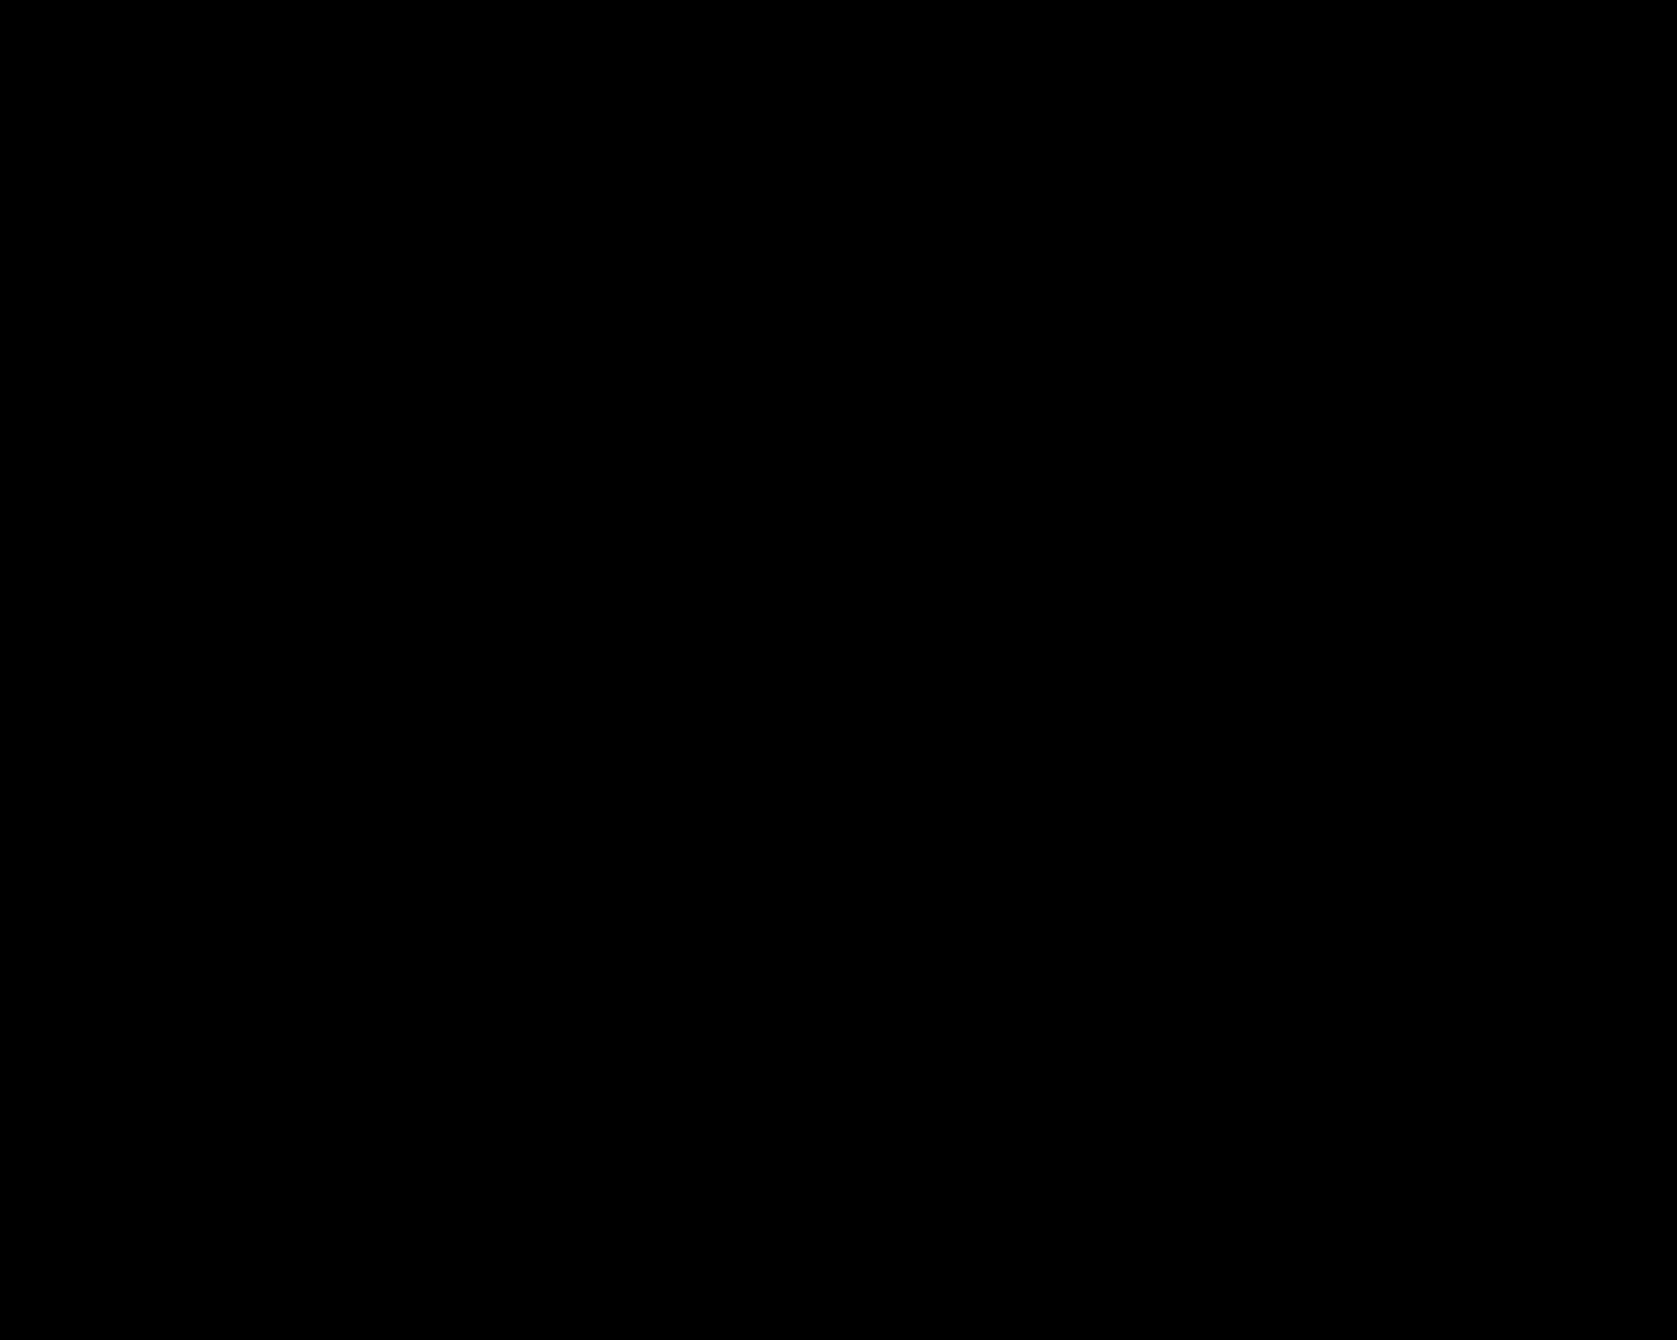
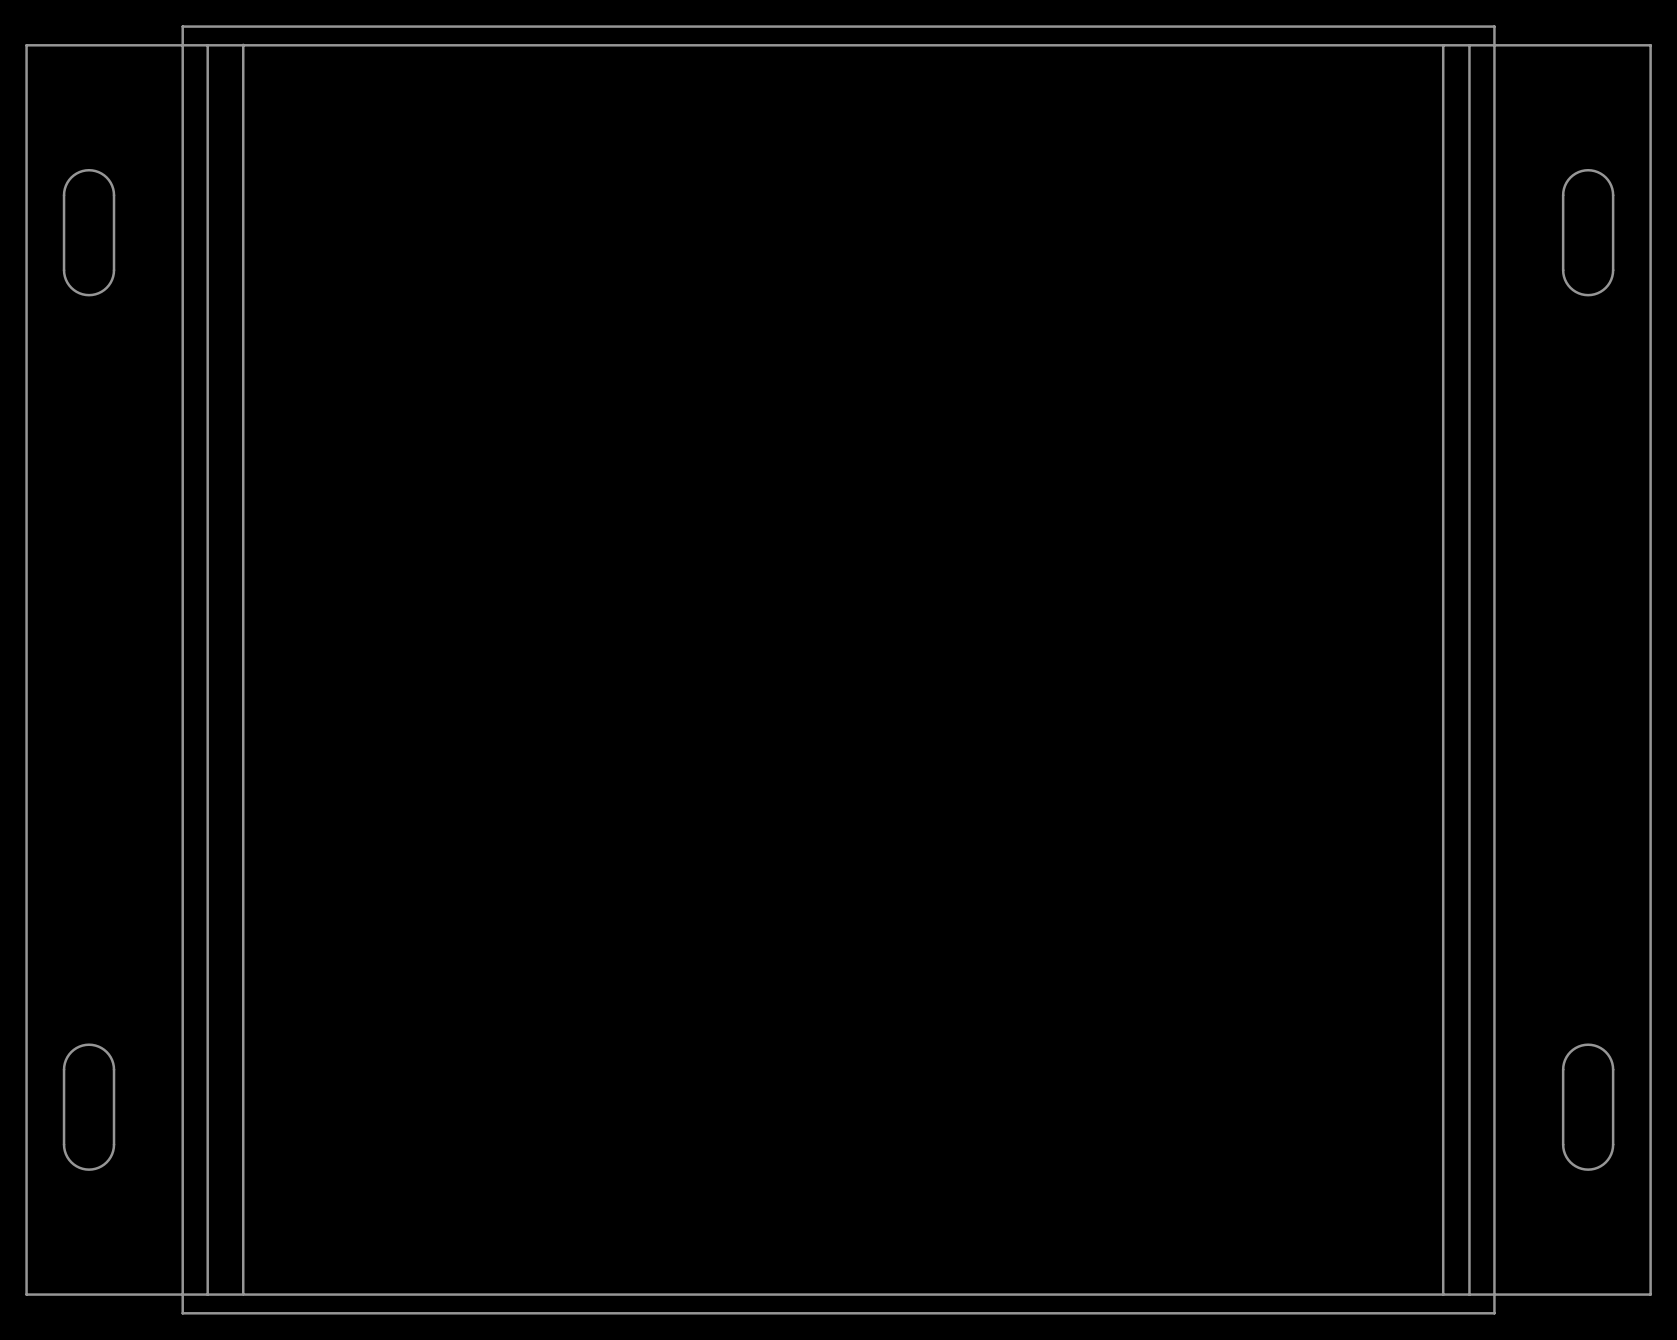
line: none -> (182, 26) (1494, 26) (1494, 1313) (182, 1313) (182, 26)
line: none -> (243, 44) (243, 1294)
line: none -> (26, 45) (1650, 45) (1650, 1294) (26, 1294) (26, 45)
line: none -> (207, 45) (207, 1294)
line: none -> (1443, 45) (1443, 1294)
line: none -> (1469, 45) (1469, 1294)
line: none -> (64, 195) (64, 276) (69, 285) (76, 291) (85, 294) (95, 294) (106, 287) (113, 273) (113, 188) (104, 175) (95, 171) (85, 170) (71, 177) (65, 185) (64, 195)
line: none -> (1563, 195) (1564, 276) (1568, 285) (1575, 291) (1584, 294) (1594, 294) (1605, 287) (1612, 273) (1612, 188) (1607, 180) (1600, 173) (1584, 170) (1570, 177) (1565, 185) (1563, 195)
line: none -> (64, 1069) (64, 1151) (69, 1159) (76, 1166) (85, 1169) (95, 1168) (106, 1162) (113, 1147) (113, 1063) (104, 1049) (95, 1045) (85, 1044) (71, 1052) (65, 1060) (64, 1069)
line: none -> (1563, 1069) (1564, 1151) (1568, 1159) (1575, 1166) (1584, 1169) (1594, 1168) (1605, 1162) (1612, 1147) (1612, 1063) (1603, 1049) (1594, 1045) (1584, 1044) (1570, 1052) (1565, 1060) (1563, 1069)

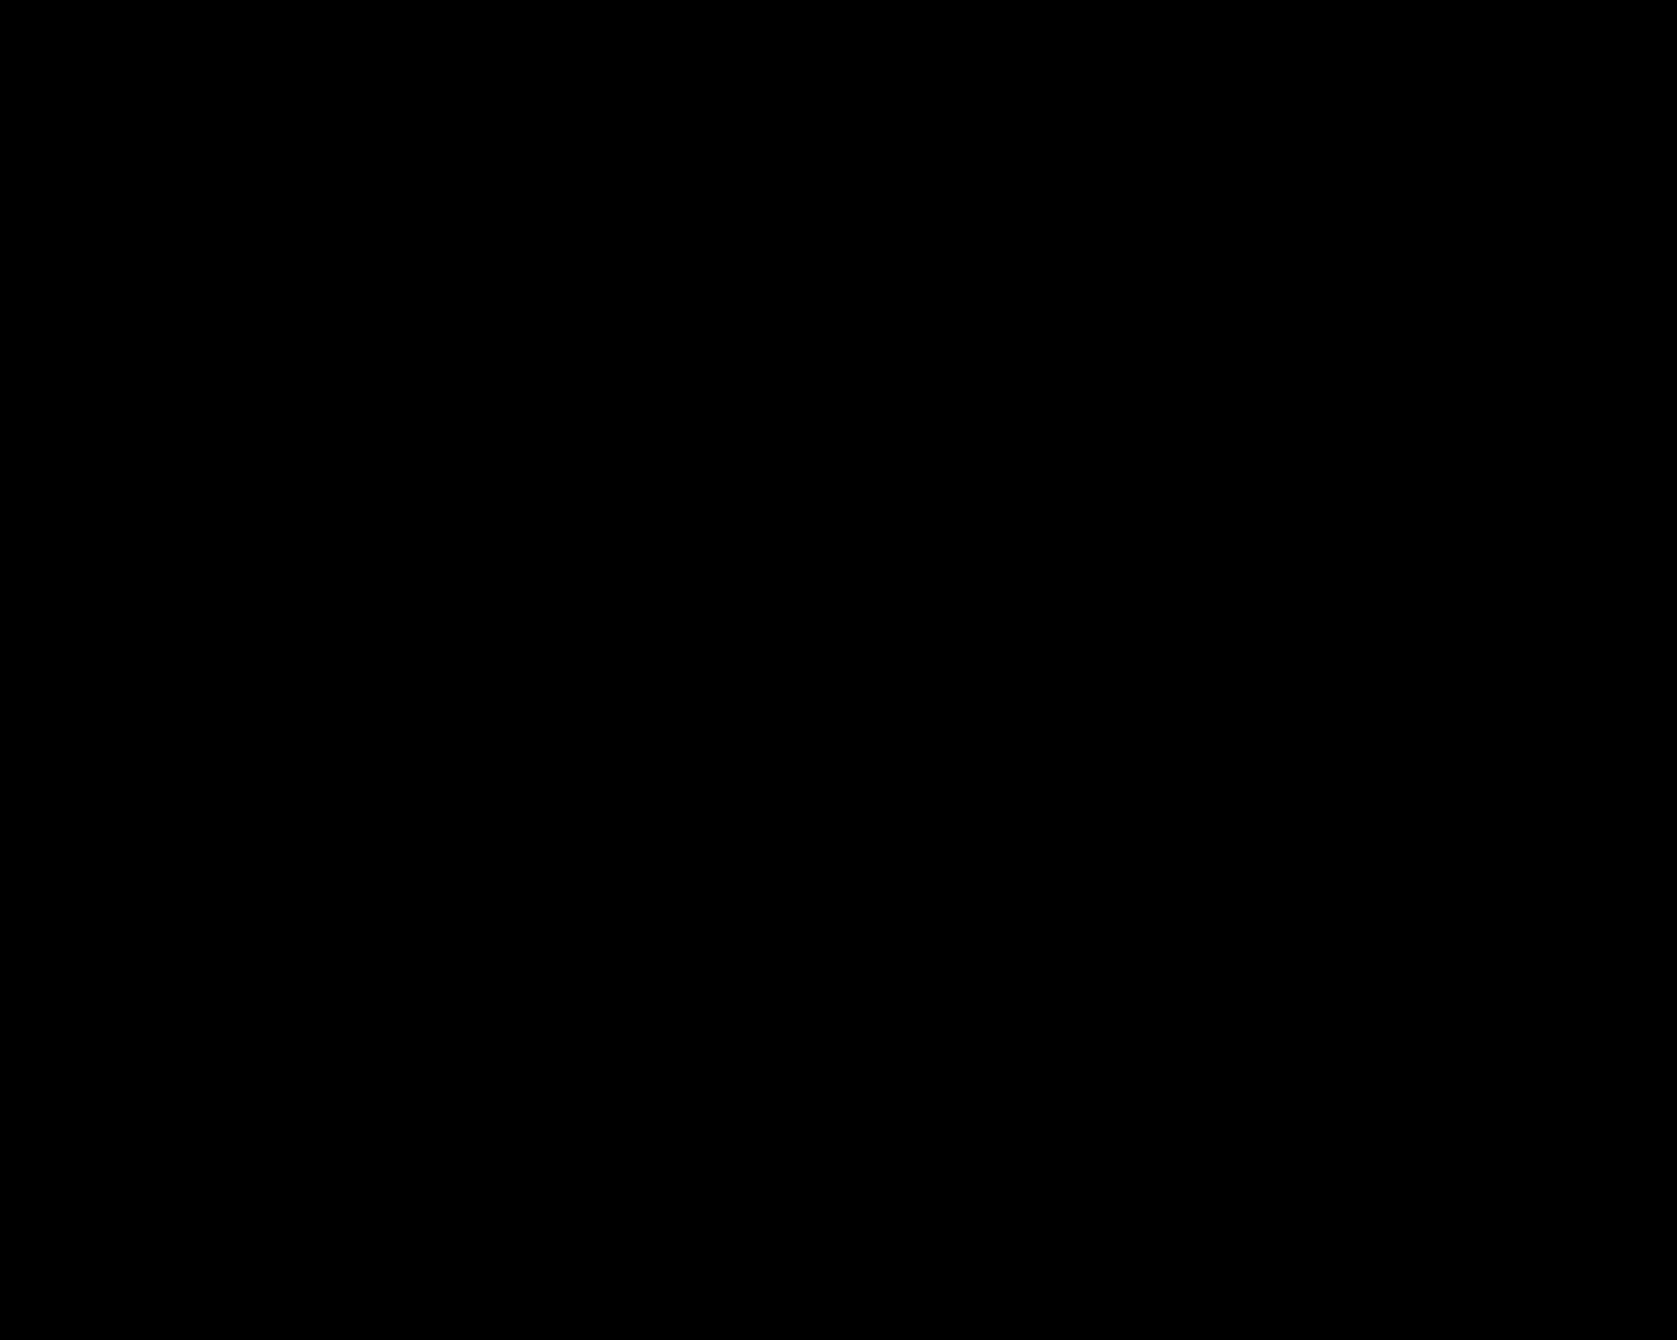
line: (182, 26) (1494, 26) (1494, 1313) (182, 1313) (182, 26) -> none
line: (243, 44) (243, 1294) -> none
line: (26, 45) (1650, 45) (1650, 1294) (26, 1294) (26, 45) -> none
line: (207, 45) (207, 1294) -> none
line: (1443, 45) (1443, 1294) -> none
line: (1469, 45) (1469, 1294) -> none
line: (64, 195) (64, 276) (69, 285) (76, 291) (85, 294) (95, 294) (106, 287) (113, 273) (113, 188) (104, 175) (95, 171) (85, 170) (71, 177) (65, 185) (64, 195) -> none
line: (1563, 195) (1564, 276) (1568, 285) (1575, 291) (1584, 294) (1594, 294) (1605, 287) (1612, 273) (1612, 188) (1607, 180) (1600, 173) (1584, 170) (1570, 177) (1565, 185) (1563, 195) -> none
line: (64, 1069) (64, 1151) (69, 1159) (76, 1166) (85, 1169) (95, 1168) (106, 1162) (113, 1147) (113, 1063) (104, 1049) (95, 1045) (85, 1044) (71, 1052) (65, 1060) (64, 1069) -> none
line: (1563, 1069) (1564, 1151) (1568, 1159) (1575, 1166) (1584, 1169) (1594, 1168) (1605, 1162) (1612, 1147) (1612, 1063) (1603, 1049) (1594, 1045) (1584, 1044) (1570, 1052) (1565, 1060) (1563, 1069) -> none

